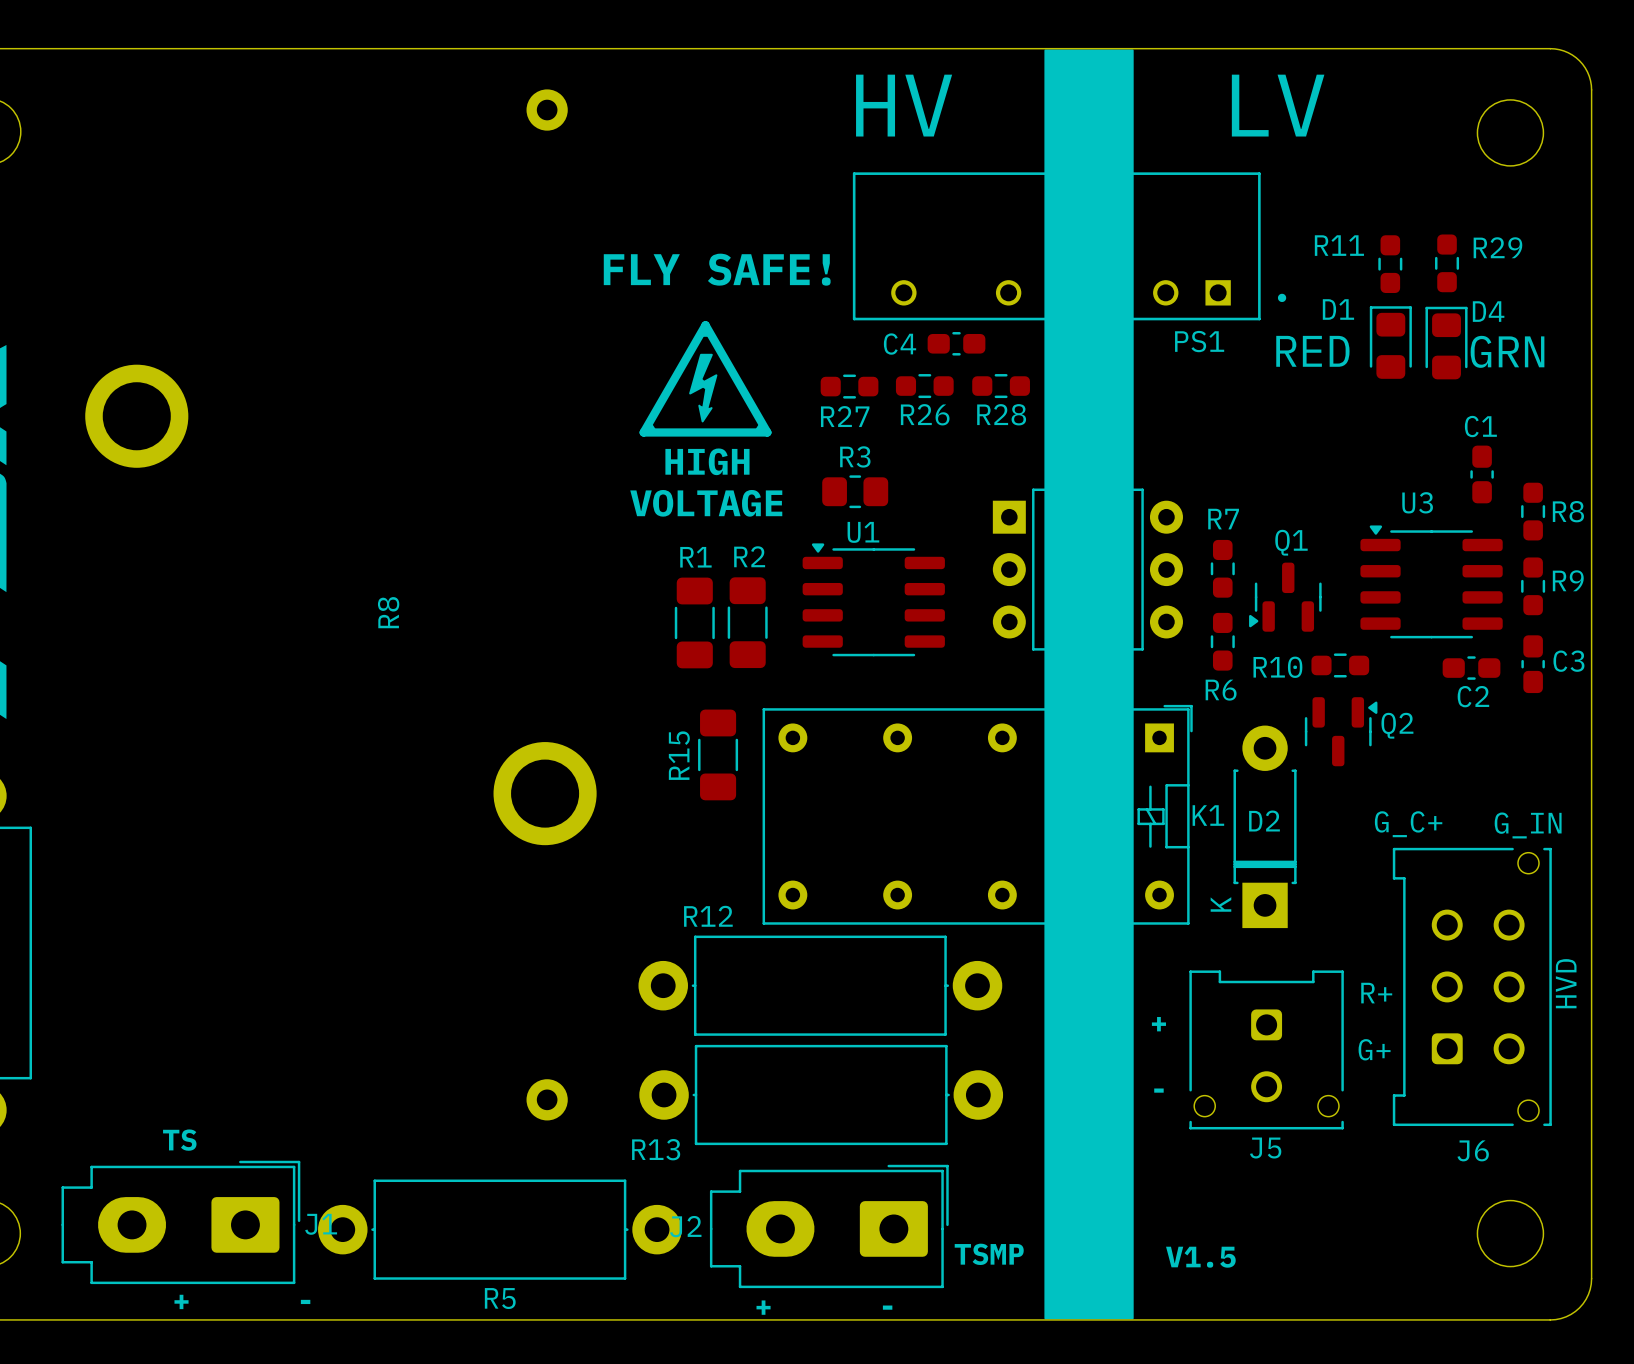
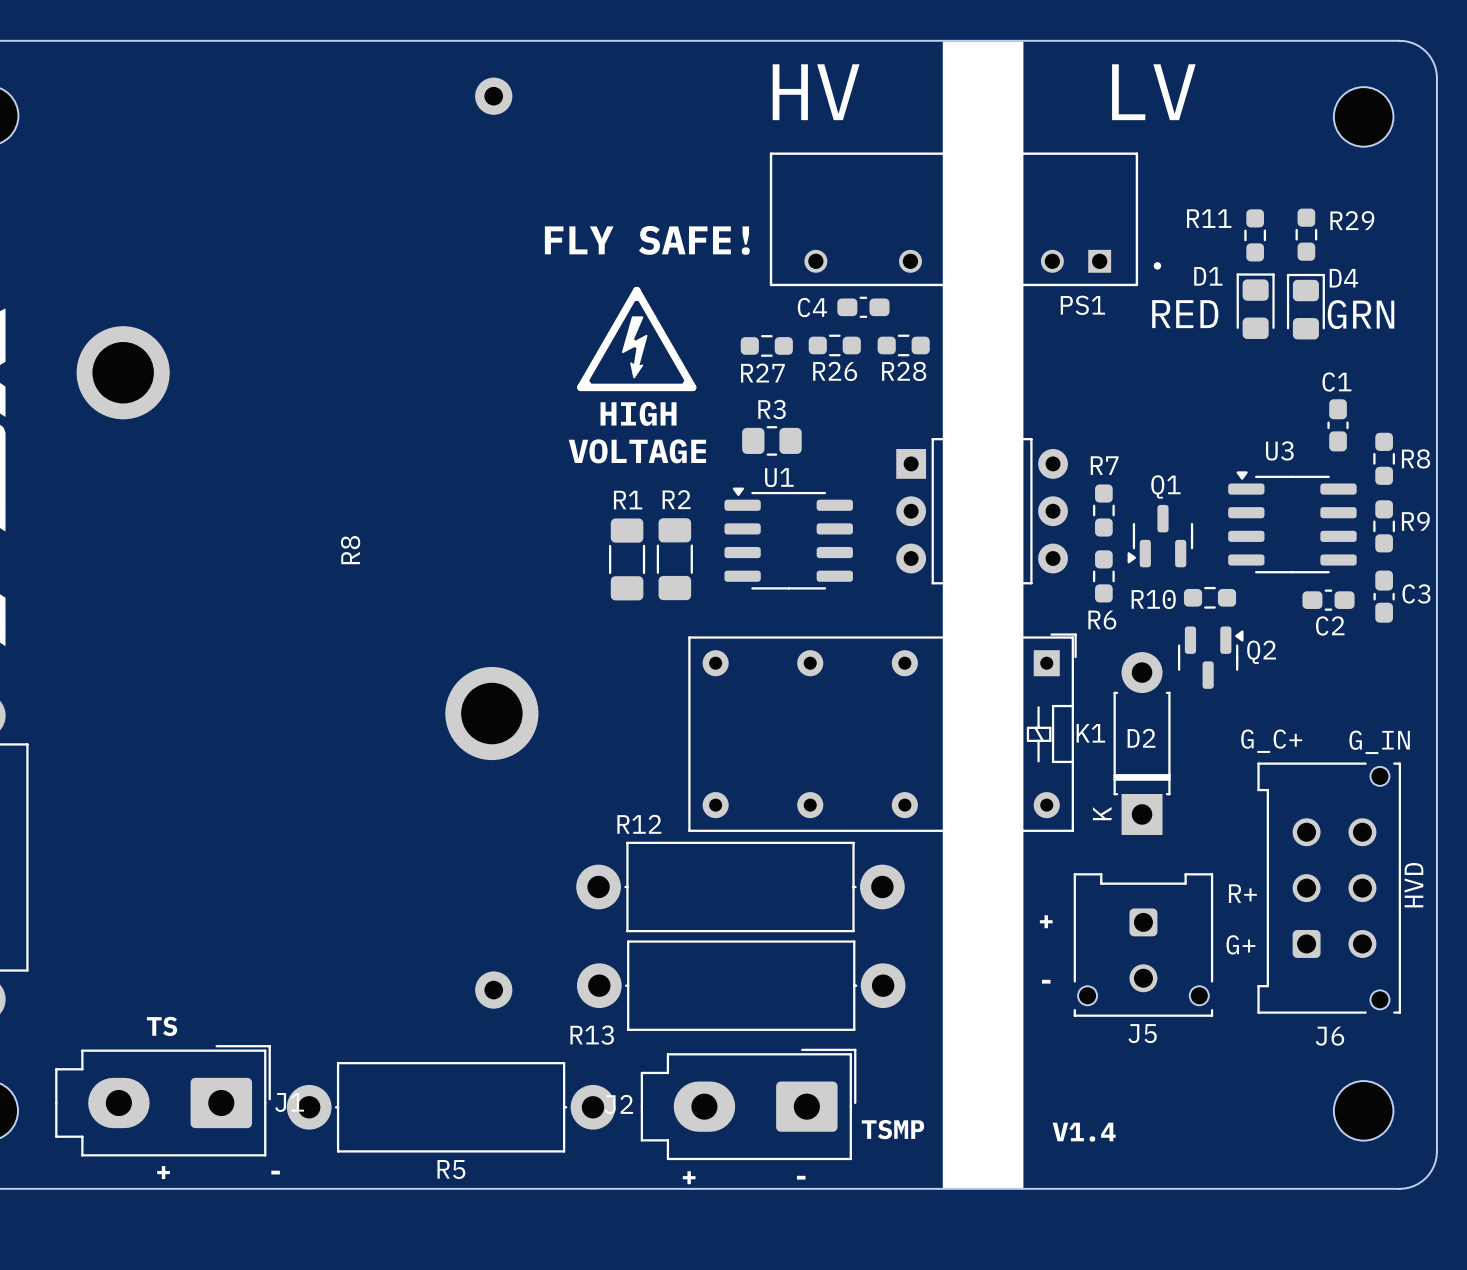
R15: (718, 754) -> none
text: V1.5 (1200, 1257) -> V1.4 (1084, 1132)

